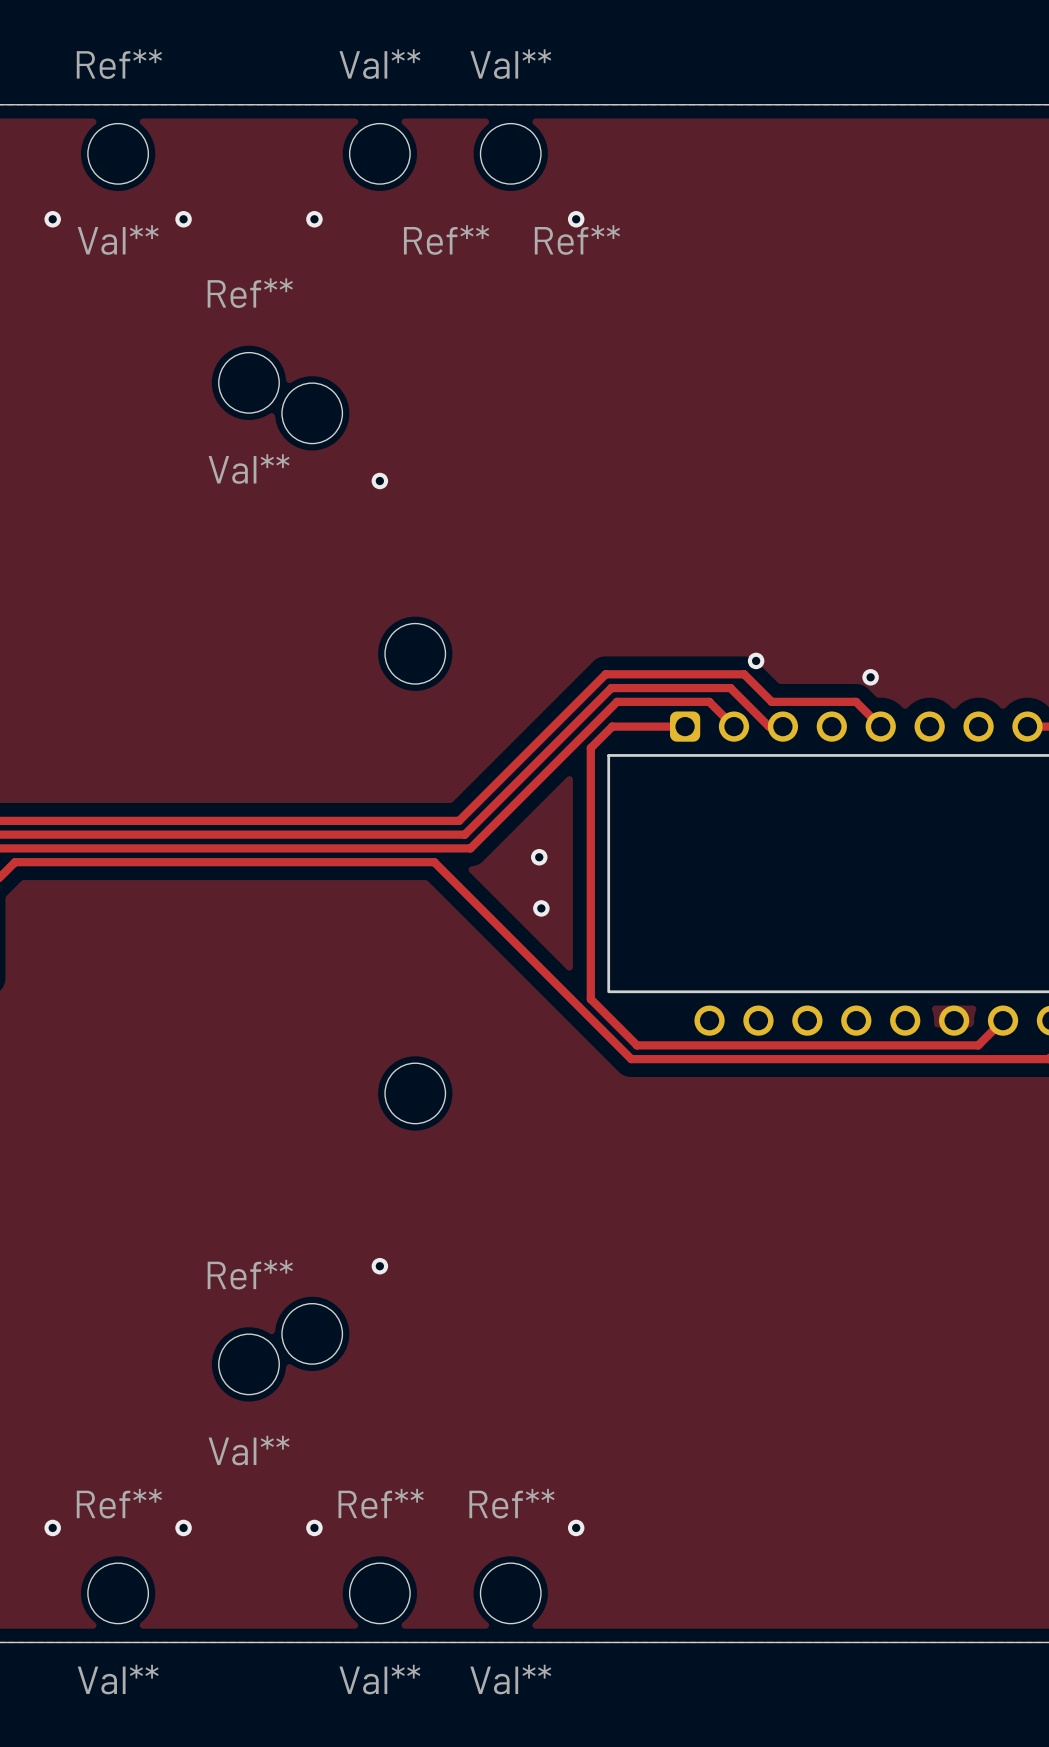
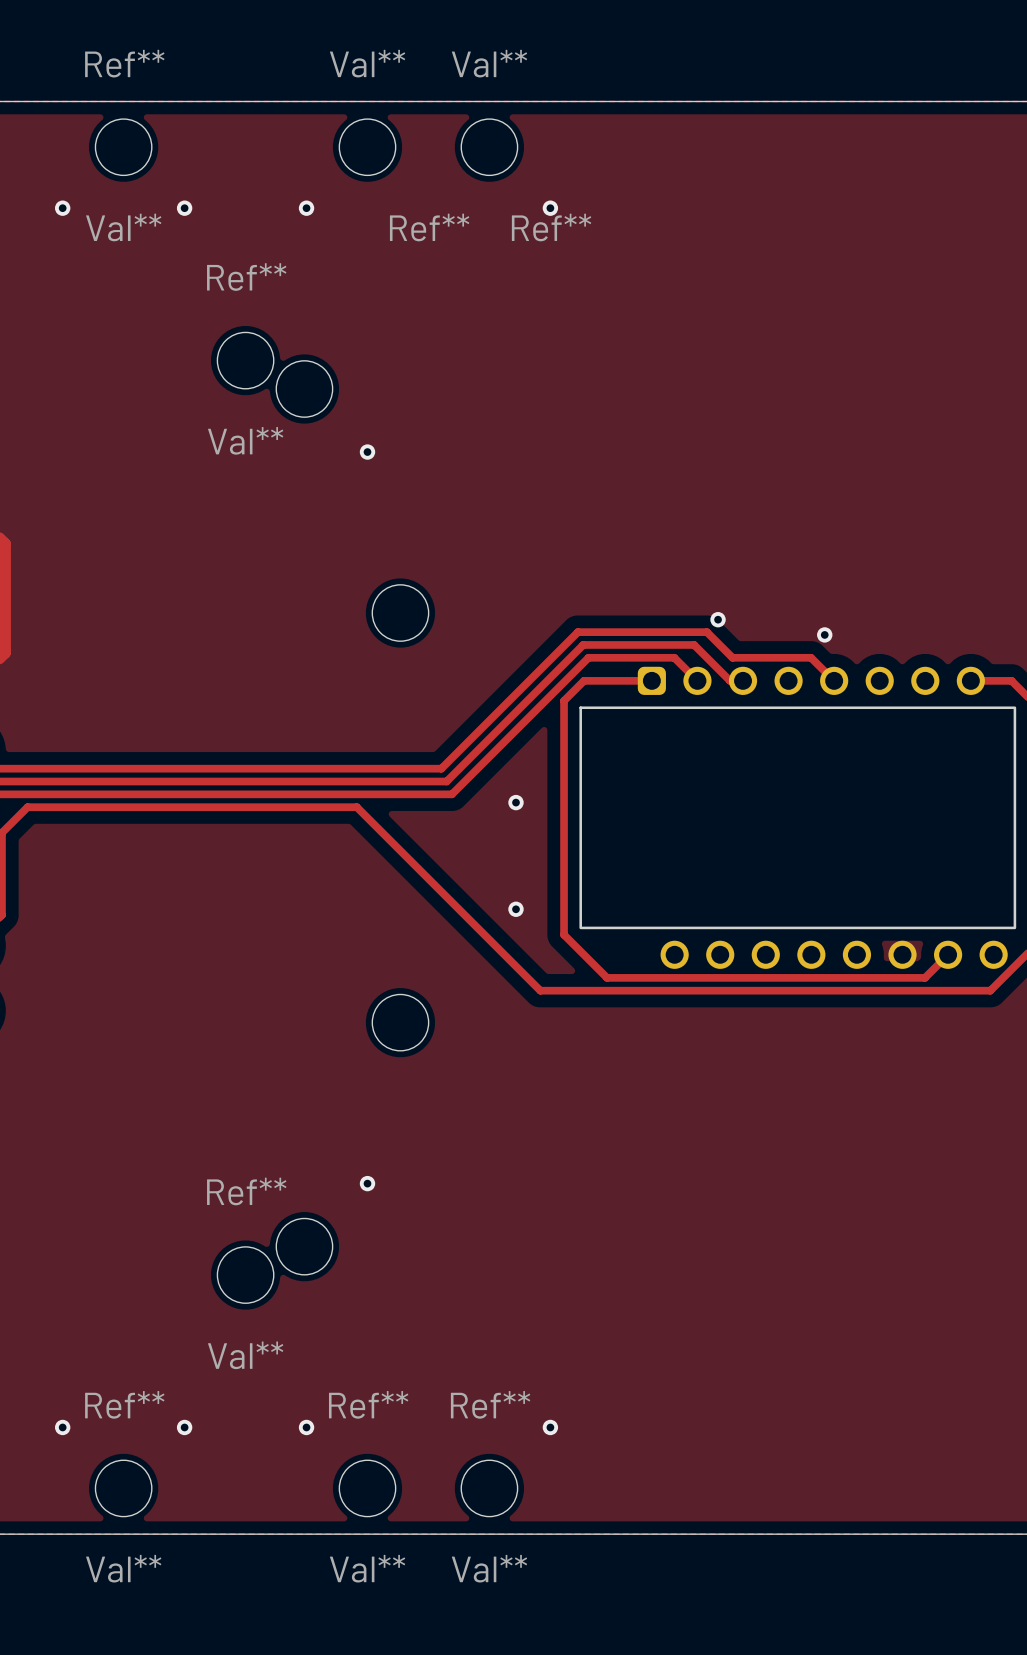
track: (368, 862) (434, 862) (631, 1059) -> (356, 807) (540, 990) (601, 990)
via position: (541, 908) -> (515, 909)

